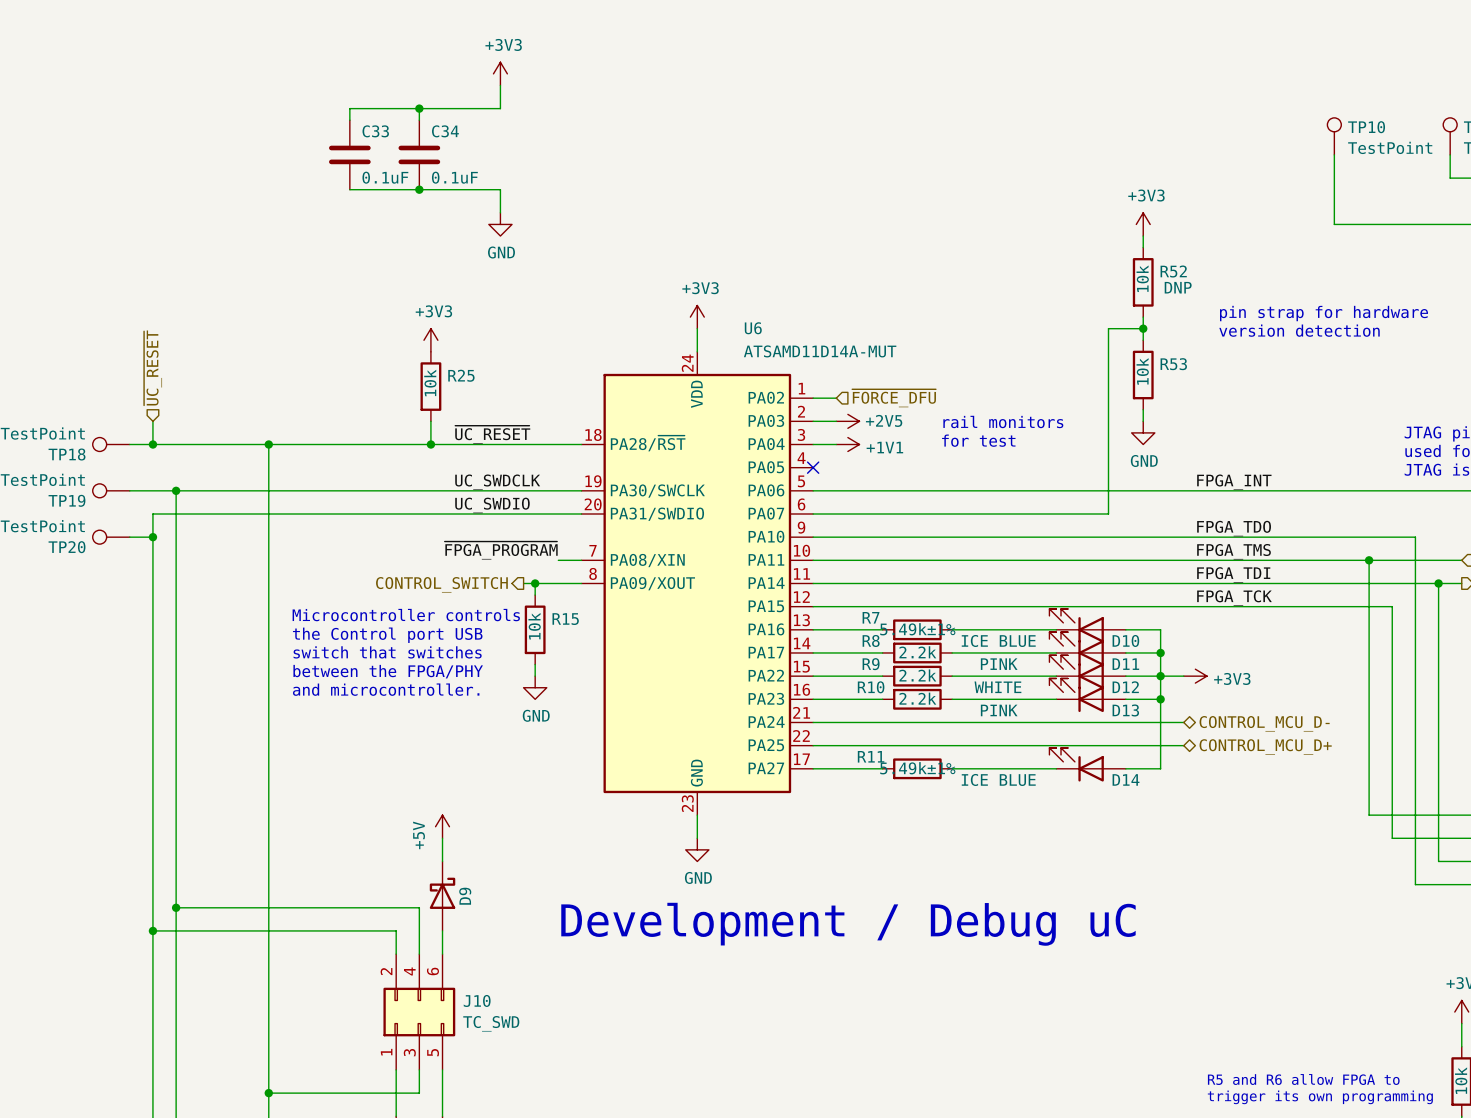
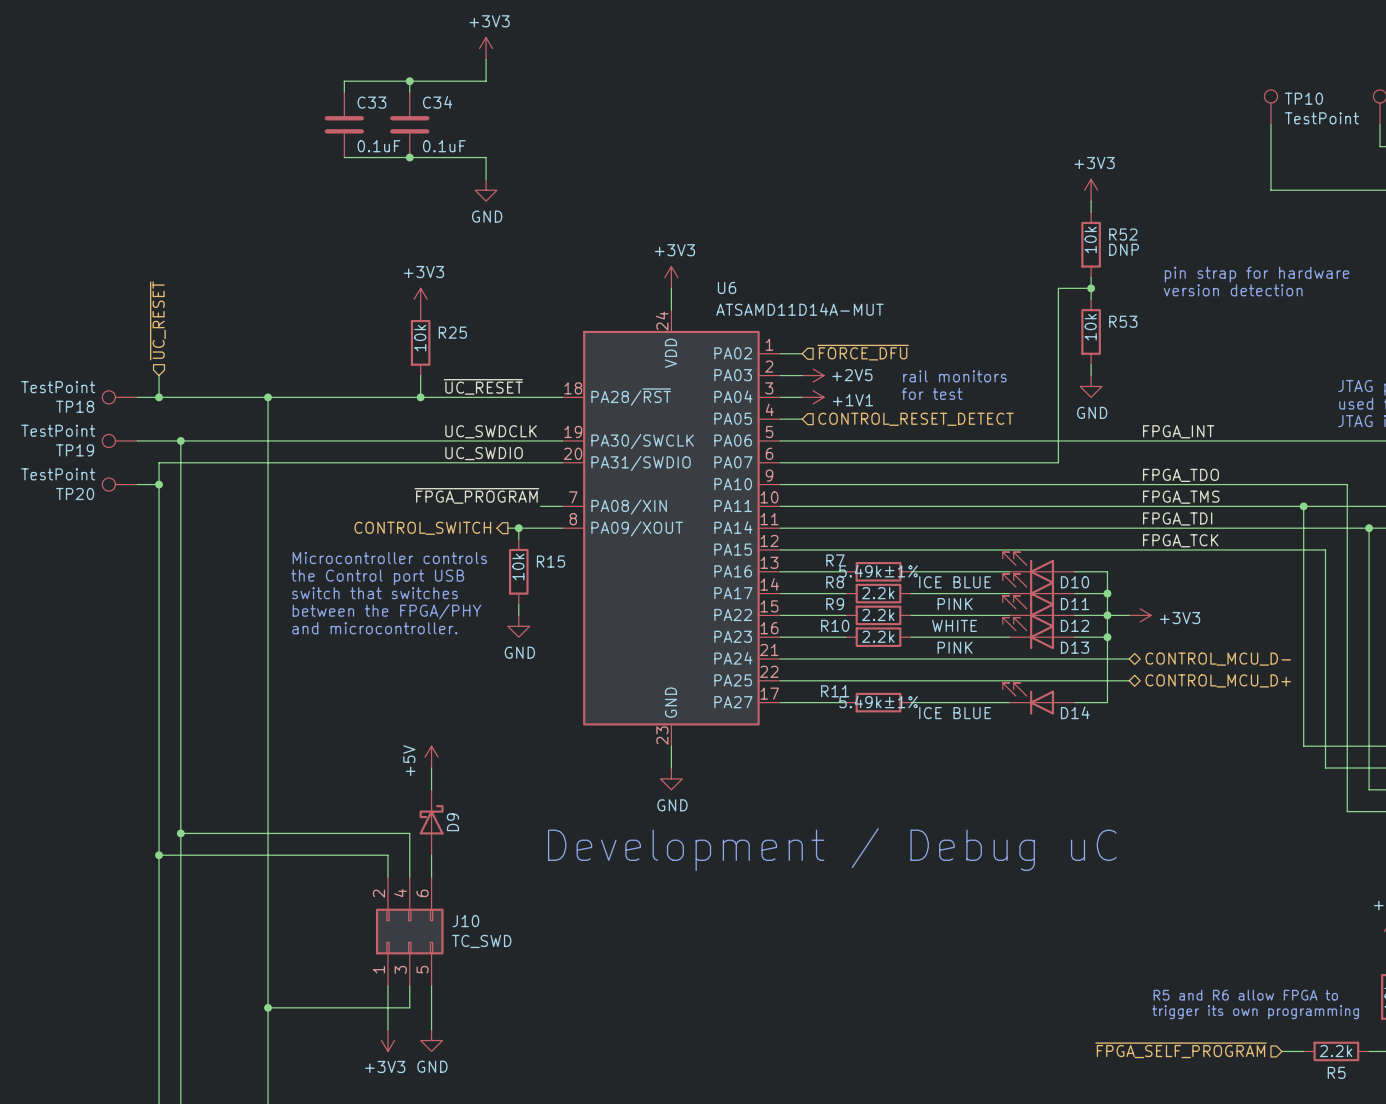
wire: none -> (780, 419) (802, 419)
no-connect mark: (813, 467) -> none
hierarchical label: none -> CONTROL_RESET_DETECT (916, 419)

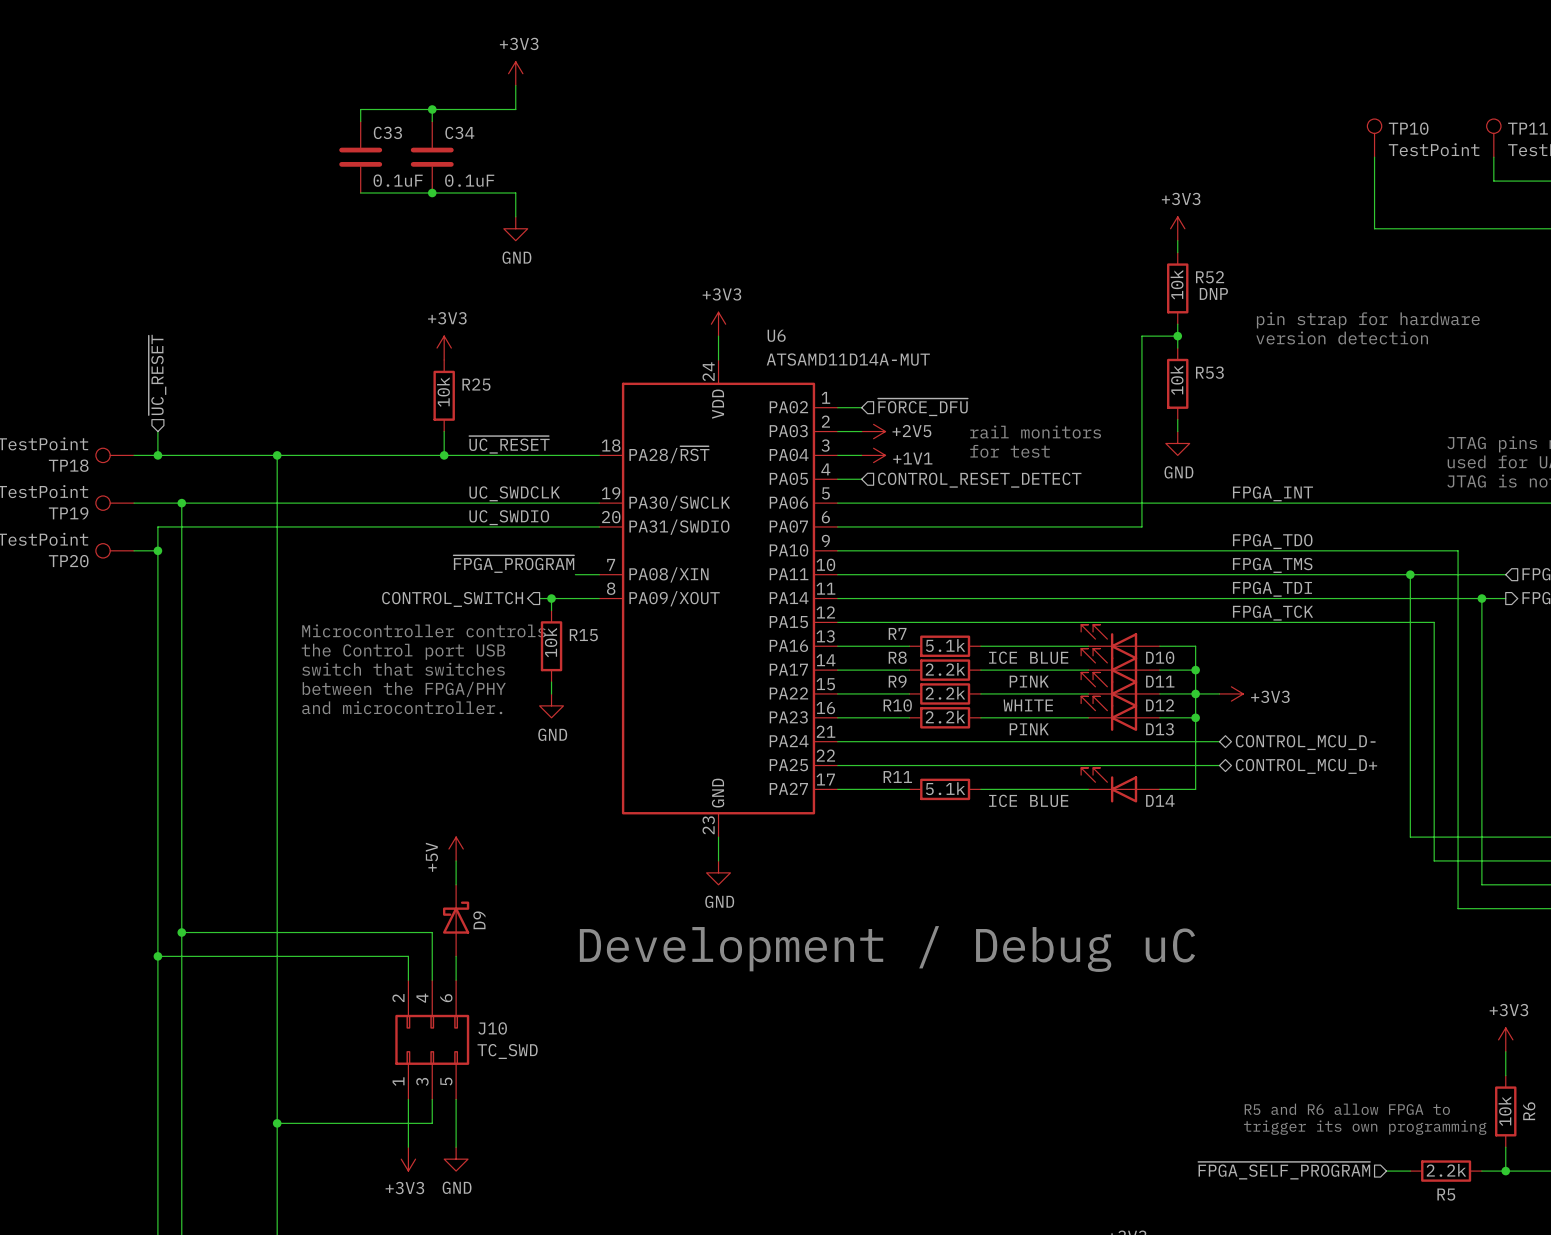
R7 value: 5.49k±1% (878, 571) -> 5.1k (945, 645)
R11 value: 5.49k±1% (878, 701) -> 5.1k (945, 788)

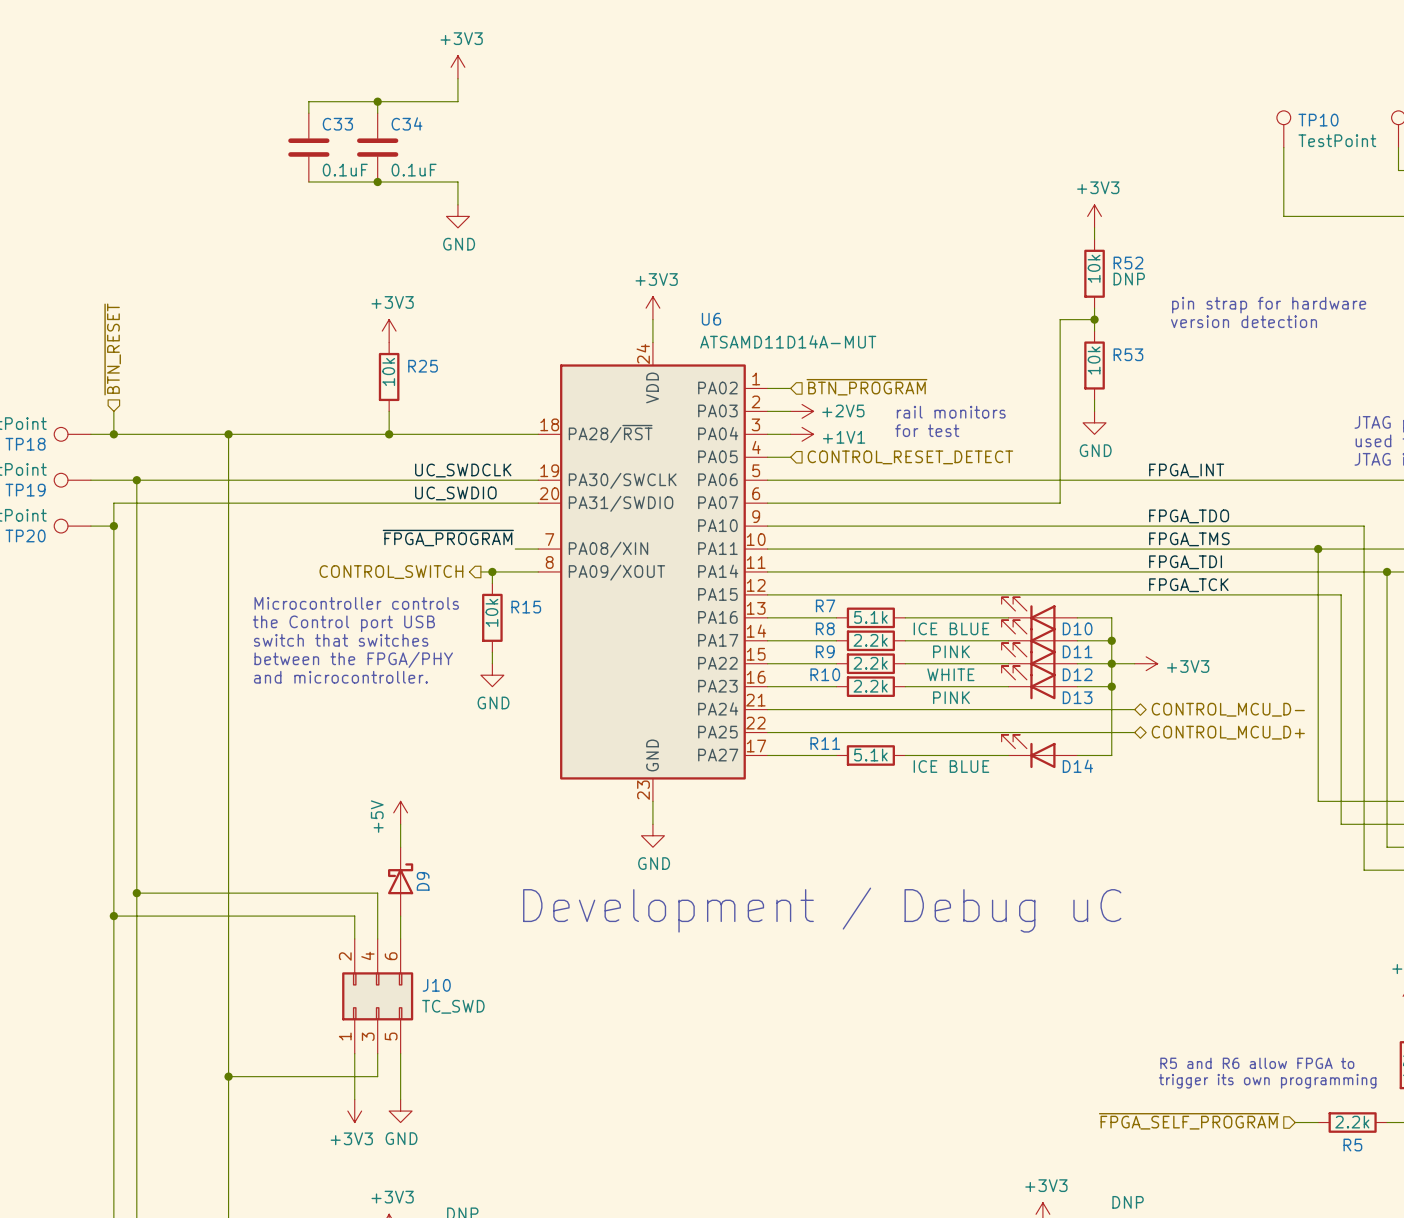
hierarchical label: ~{UC_RESET} (157, 375) -> ~{BTN_RESET} (112, 349)
hierarchical label: ~{FORCE_DFU} (922, 407) -> ~{BTN_PROGRAM} (866, 387)
label: ~{UC_RESET} (509, 444) -> none

